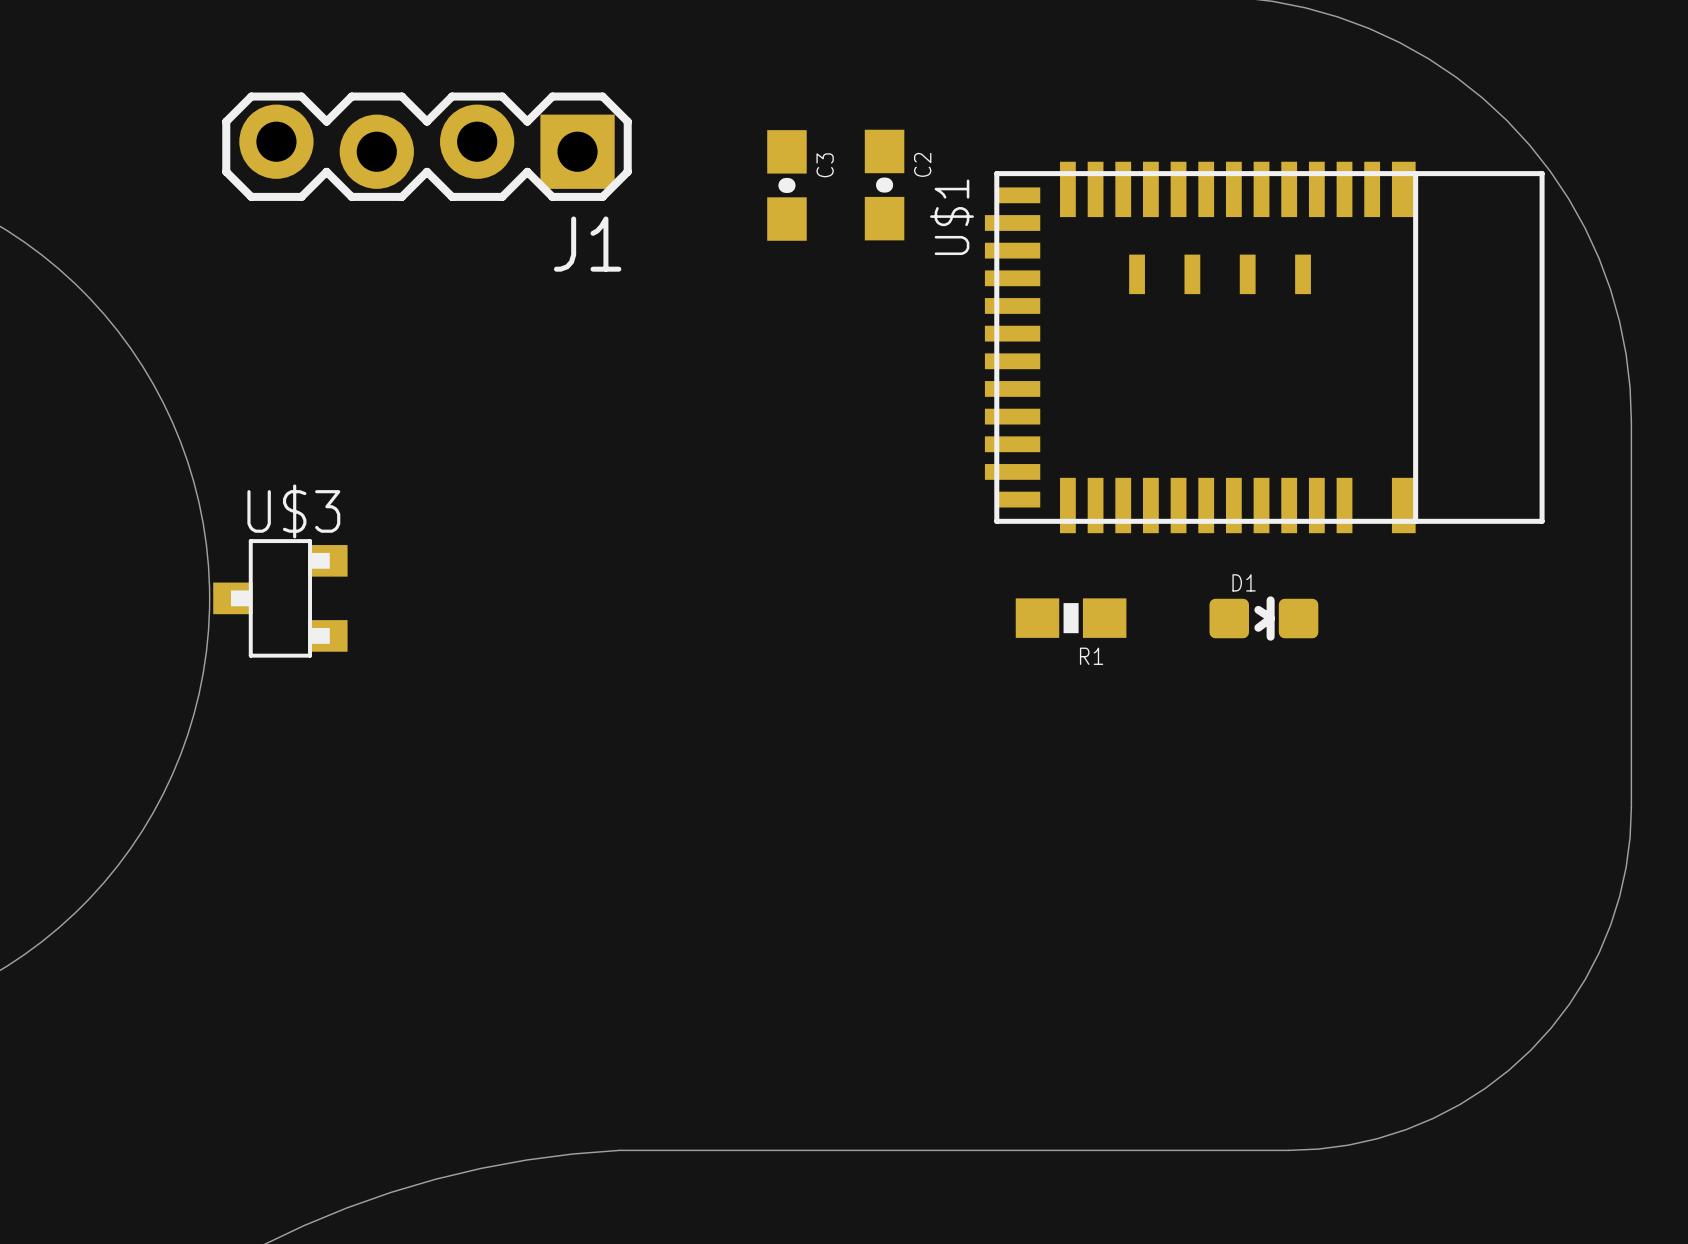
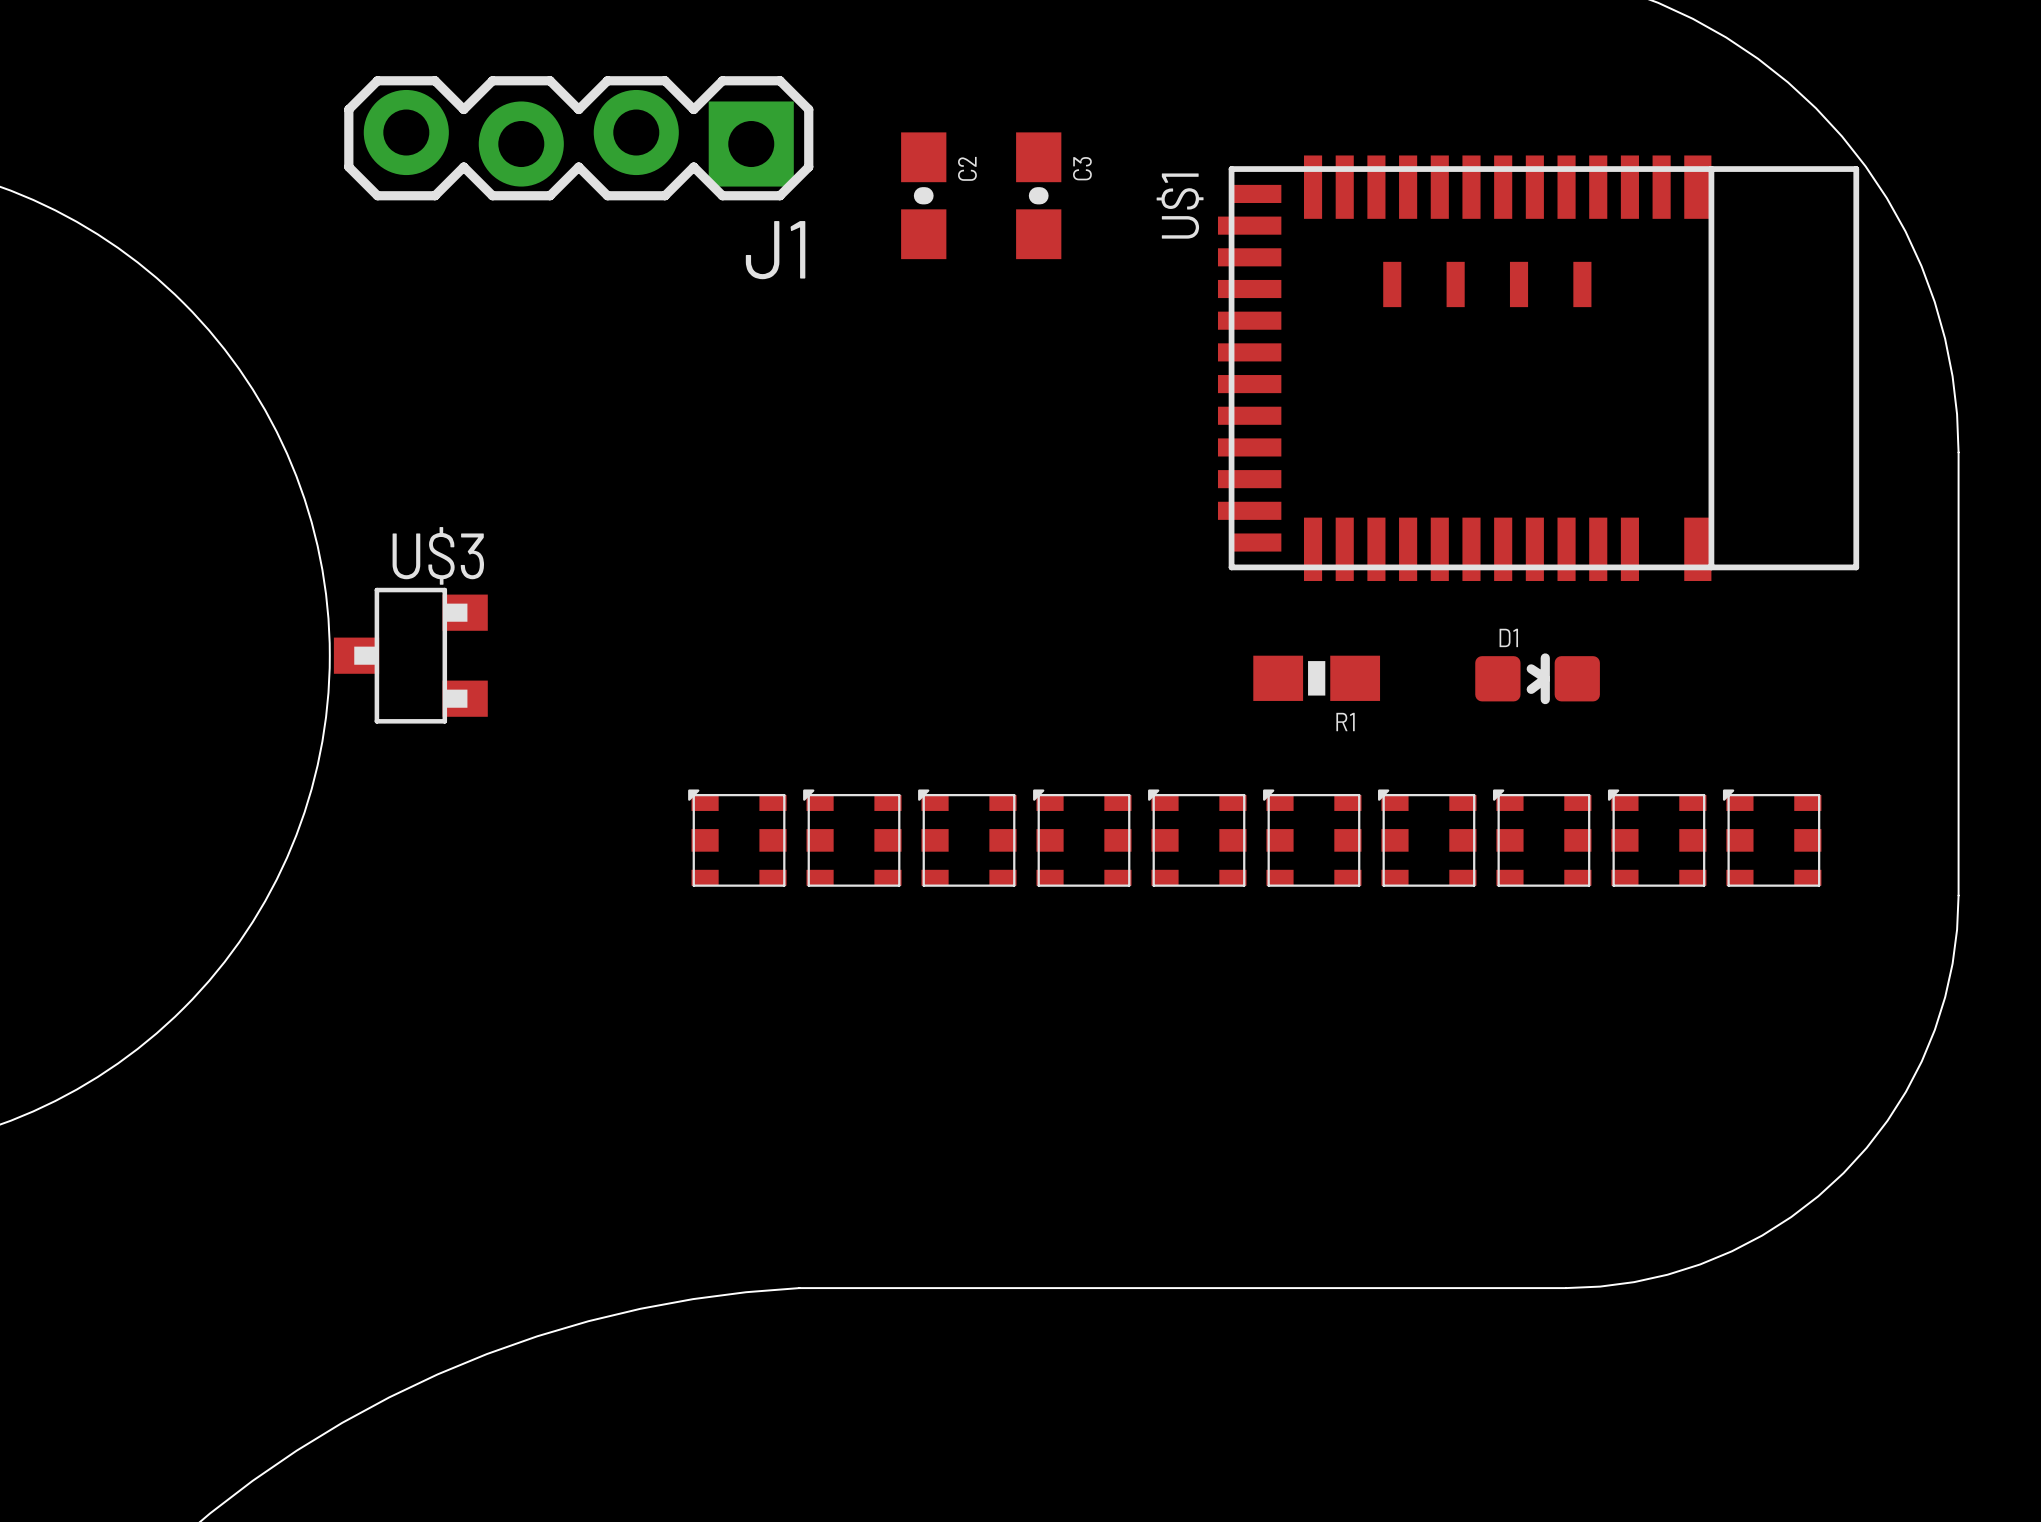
C3 position: (786, 185) -> (1038, 195)
C2 position: (884, 185) -> (923, 195)
part: none -> (737, 838)
part: none -> (852, 838)
part: none -> (967, 838)
part: none -> (1082, 838)
part: none -> (1197, 838)
part: none -> (1312, 838)
part: none -> (1427, 838)
part: none -> (1542, 838)
part: none -> (1657, 838)
part: none -> (1772, 838)

